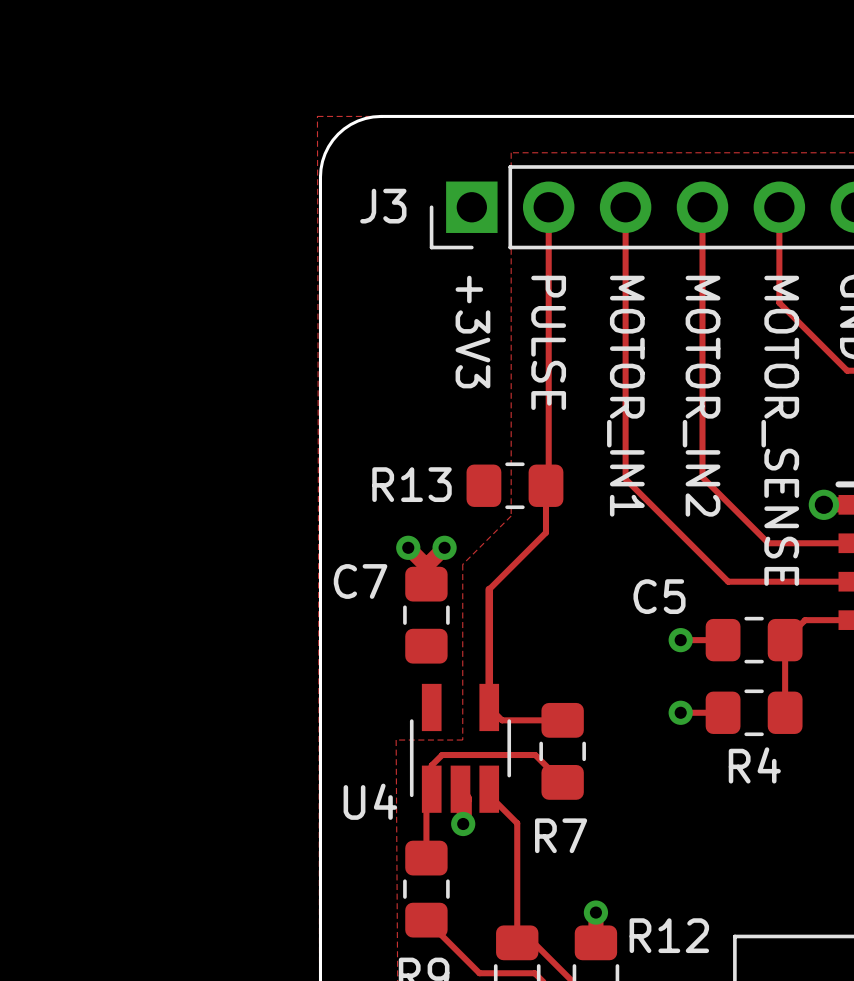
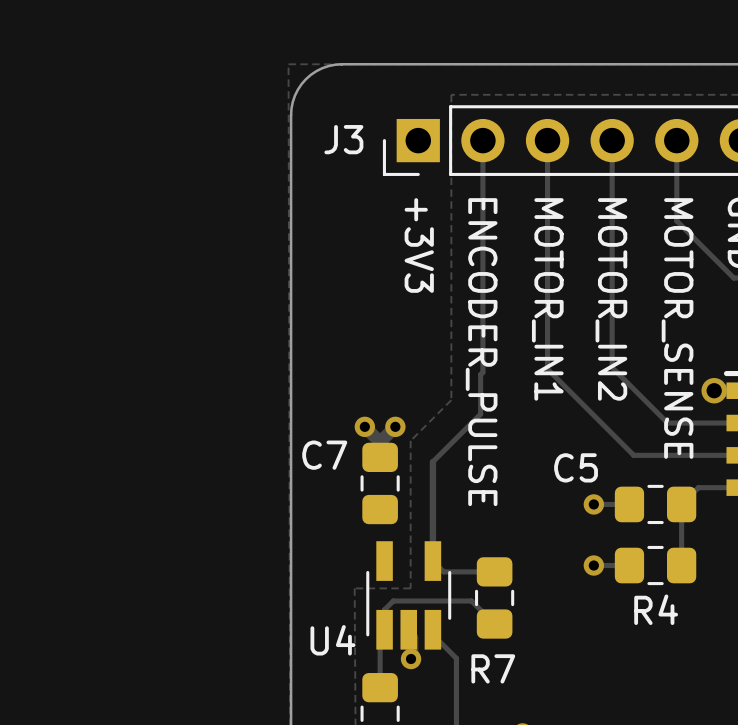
text: PULSE (548, 342) -> ENCODER_PULSE (481, 352)
R13: (514, 485) -> none

